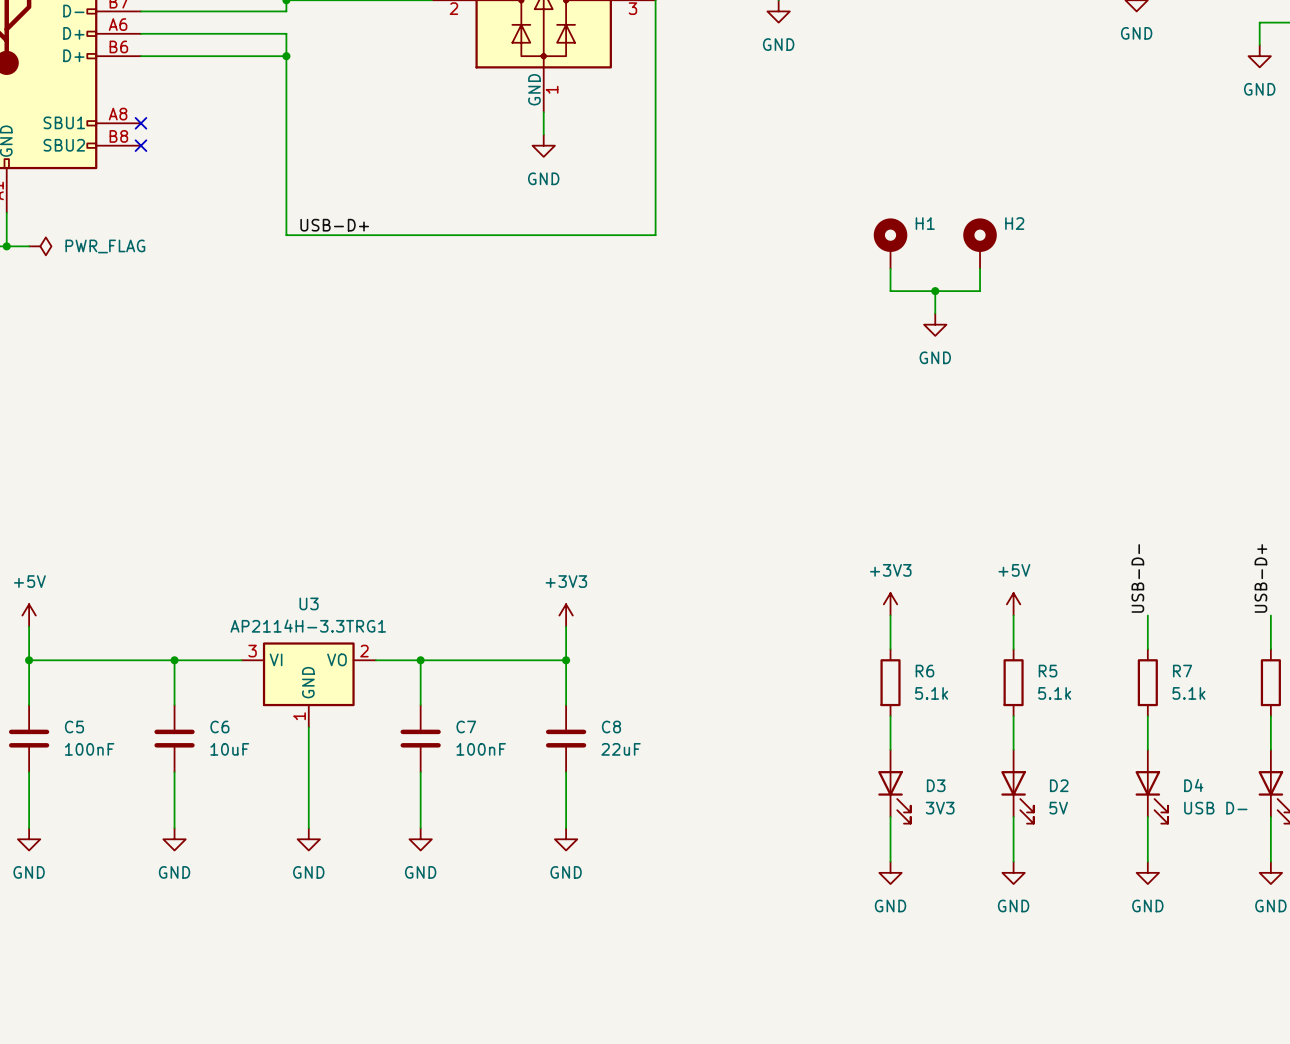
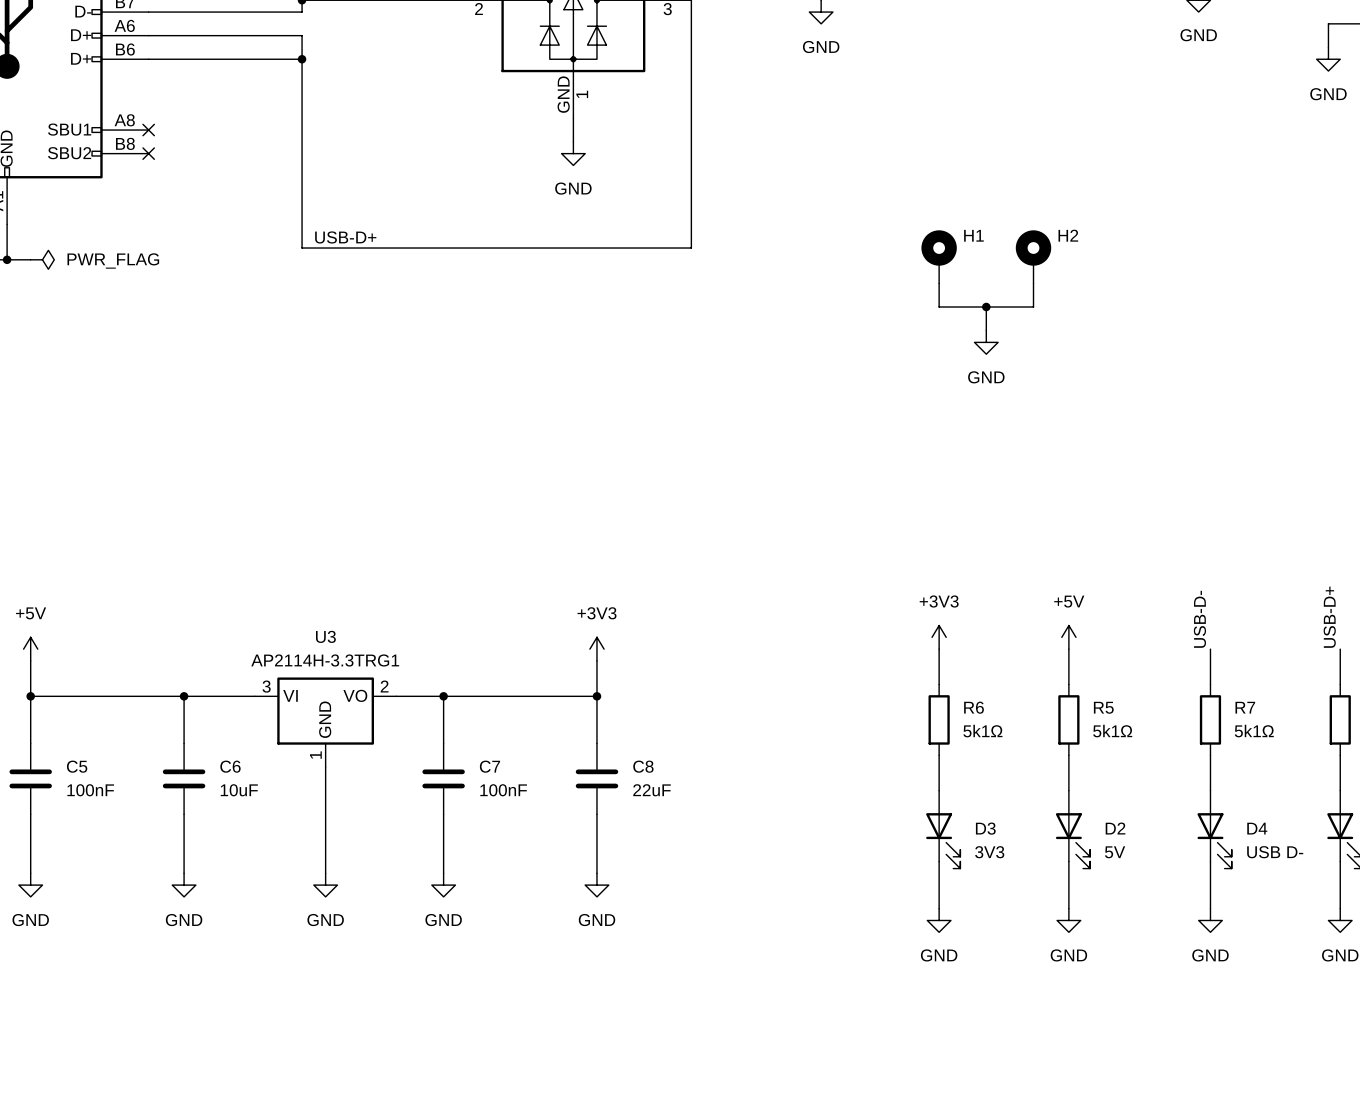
R6 value: 5.1k (931, 693) -> 5k1Ω (982, 731)
R5 value: 5.1k (1054, 693) -> 5k1Ω (1112, 731)
R7 value: 5.1k (1188, 693) -> 5k1Ω (1254, 731)

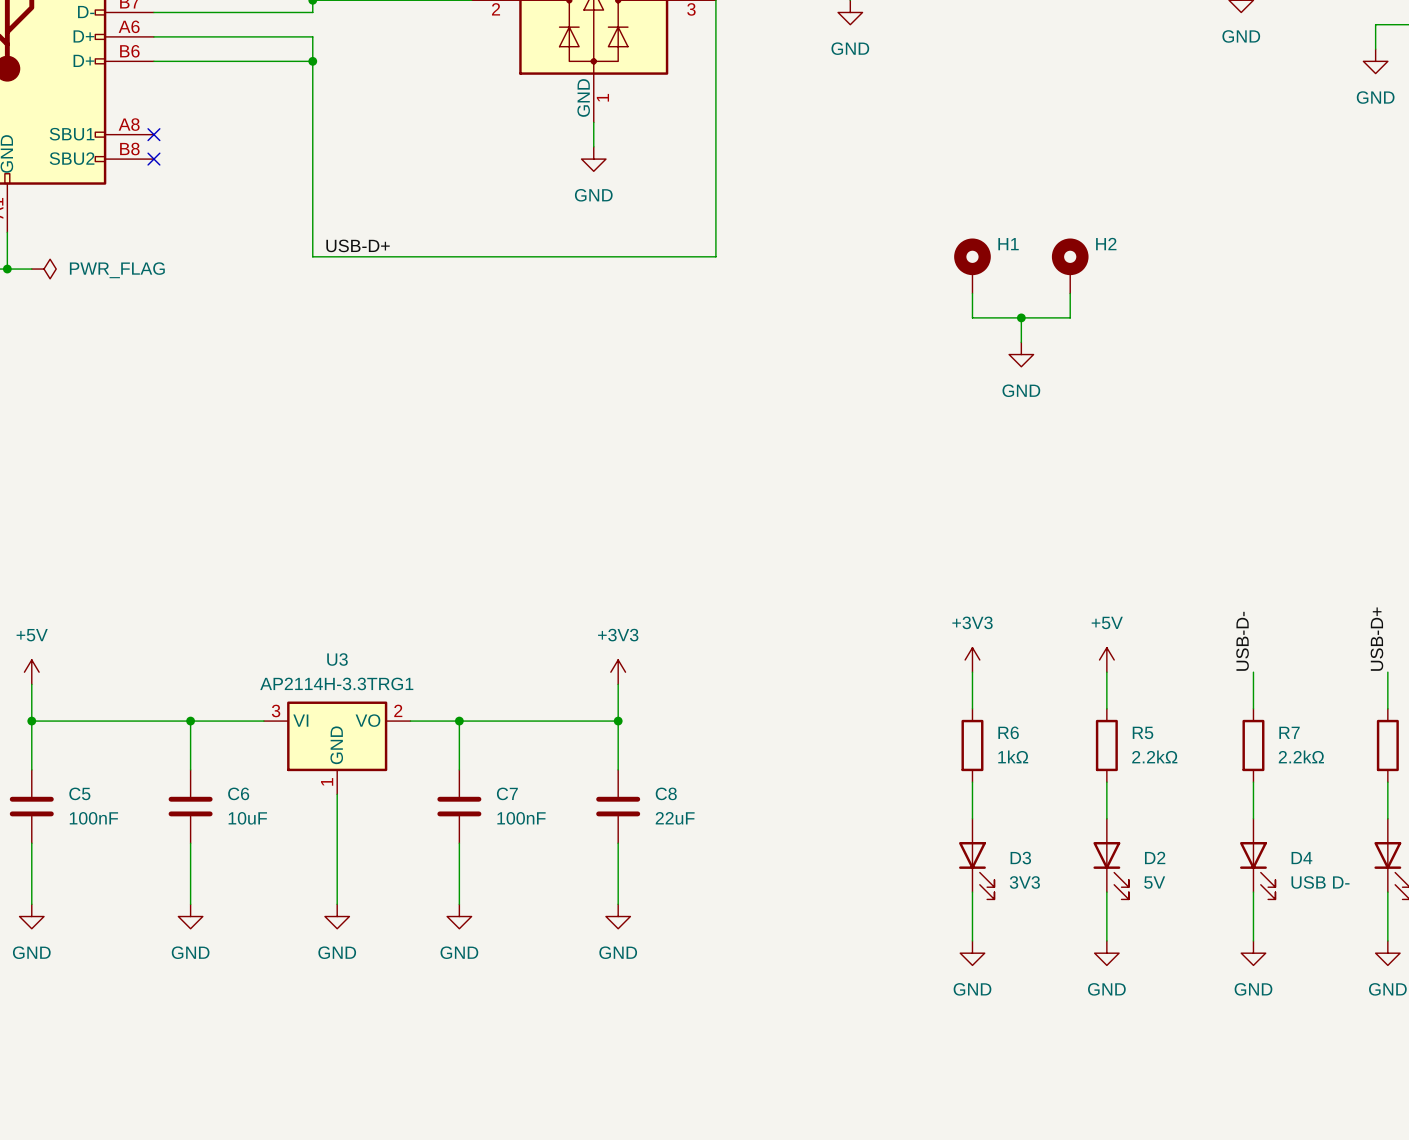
R6 value: 5k1Ω (982, 731) -> 1kΩ (1013, 756)
R5 value: 5k1Ω (1112, 731) -> 2.2kΩ (1154, 756)
R7 value: 5k1Ω (1254, 731) -> 2.2kΩ (1301, 756)

